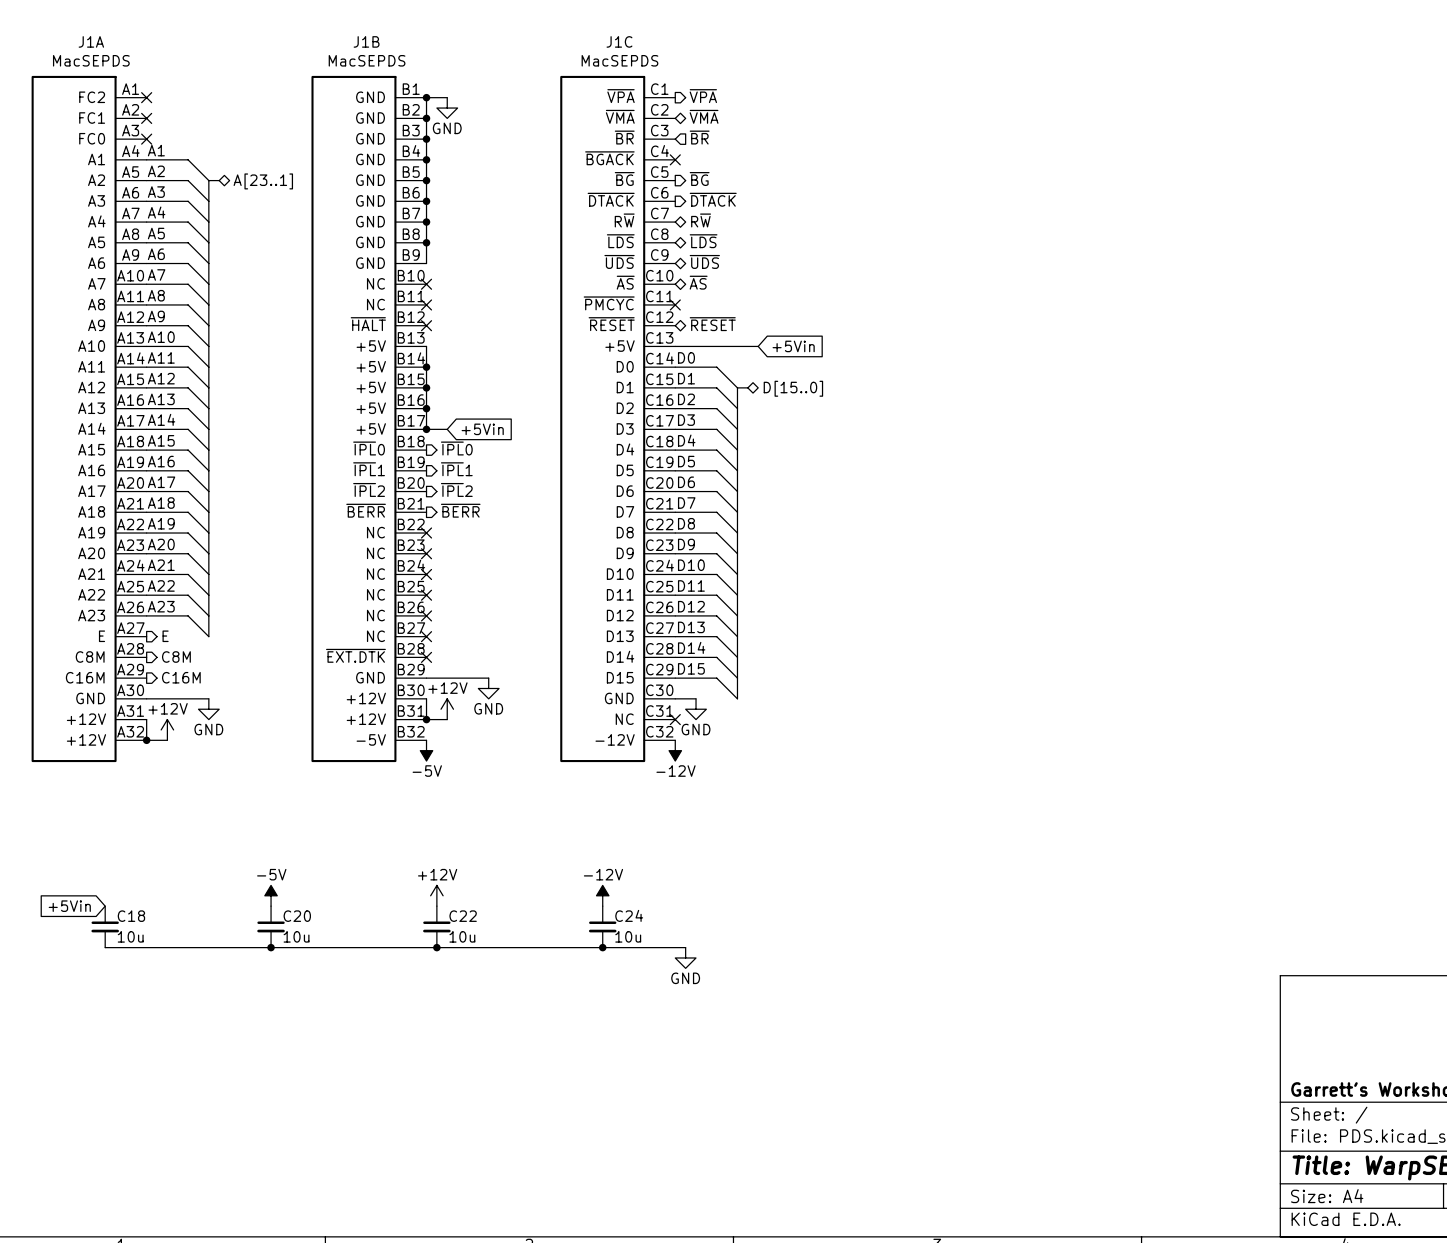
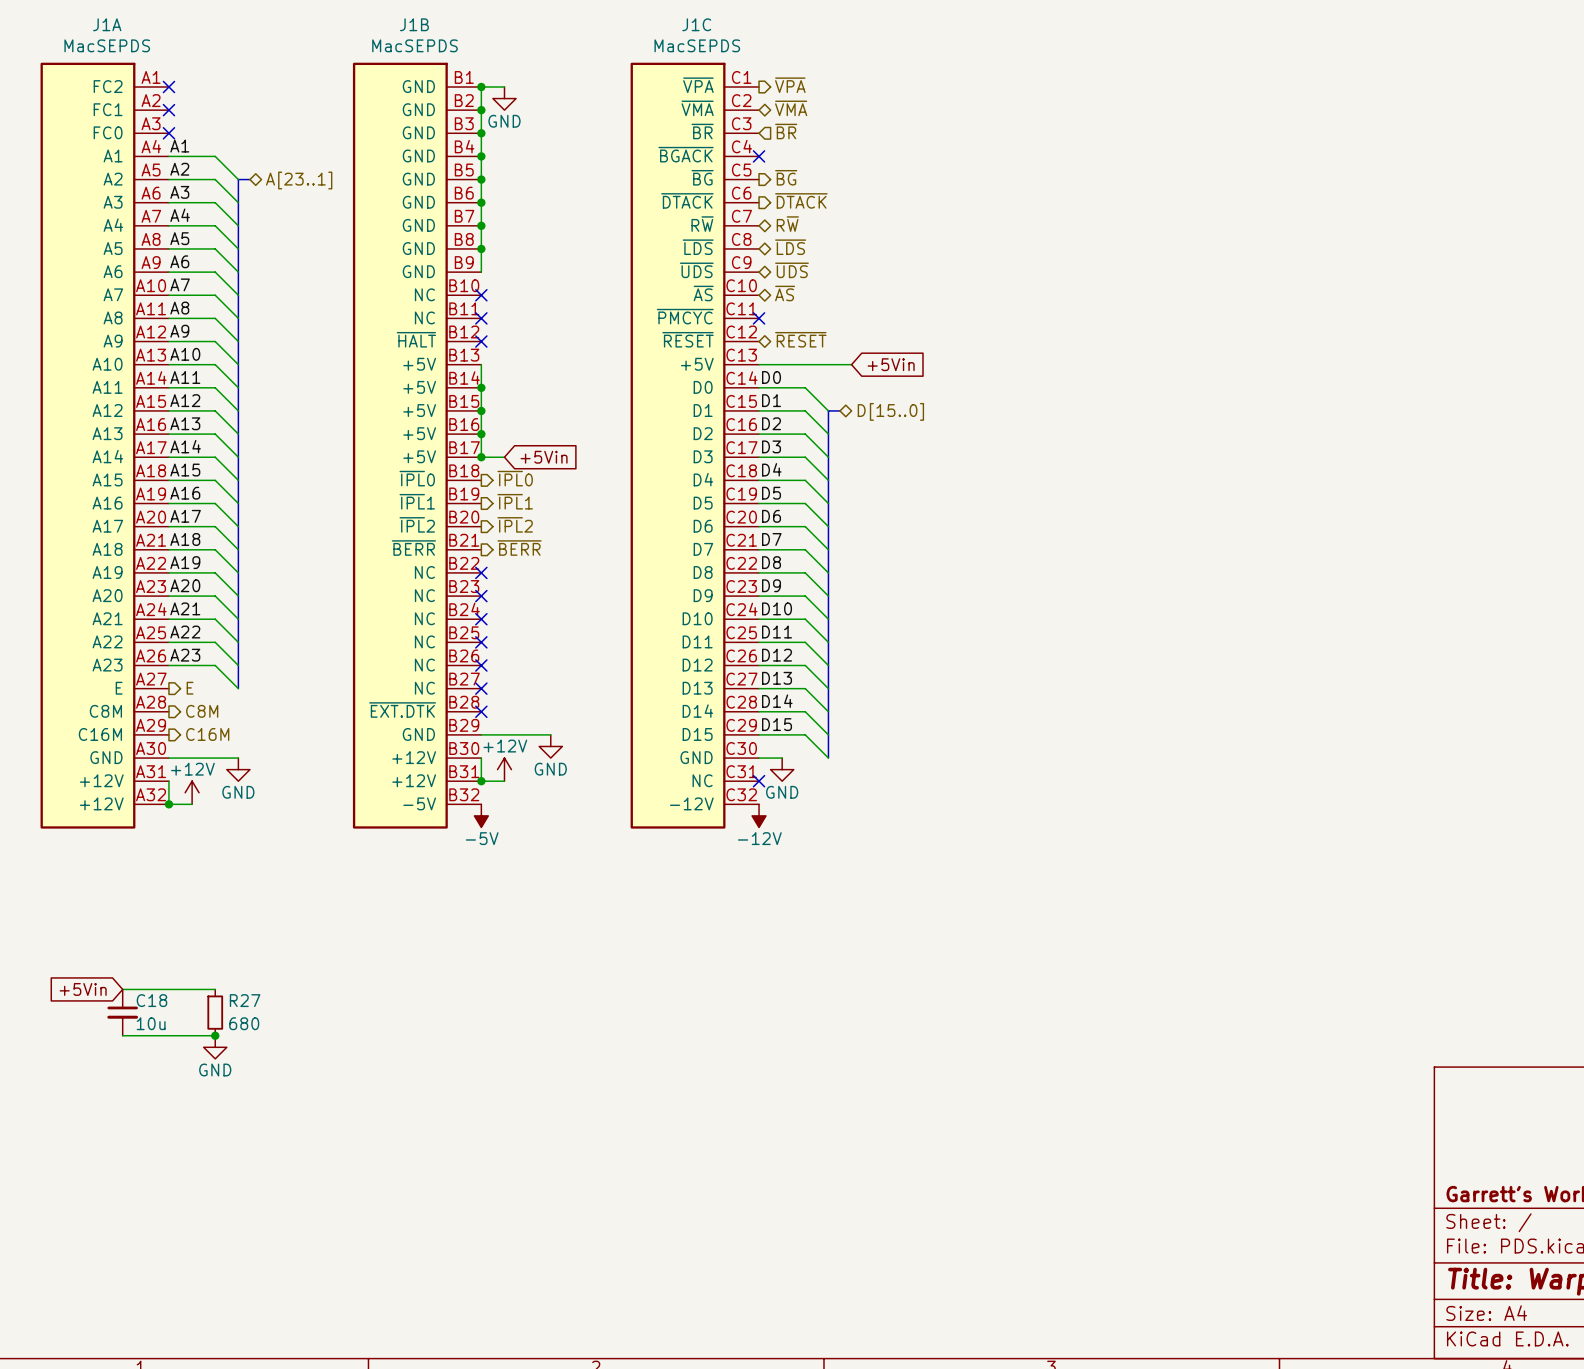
power symbol: -5V (271, 895) -> none
power symbol: +12V (436, 895) -> none
power symbol: -12V (602, 895) -> none
wire: none -> (122, 989) (215, 989)
R27: none -> 680 (215, 1012)
C20: 10u (271, 926) -> none
C22: 10u (436, 926) -> none
C24: 10u (602, 926) -> none
wire: (188, 947) (685, 947) -> none
junction: none -> (215, 1035)
junction: (271, 947) -> none
junction: (436, 947) -> none
junction: (602, 947) -> none
power symbol: none -> GND (215, 1047)
power symbol: GND (685, 957) -> none

